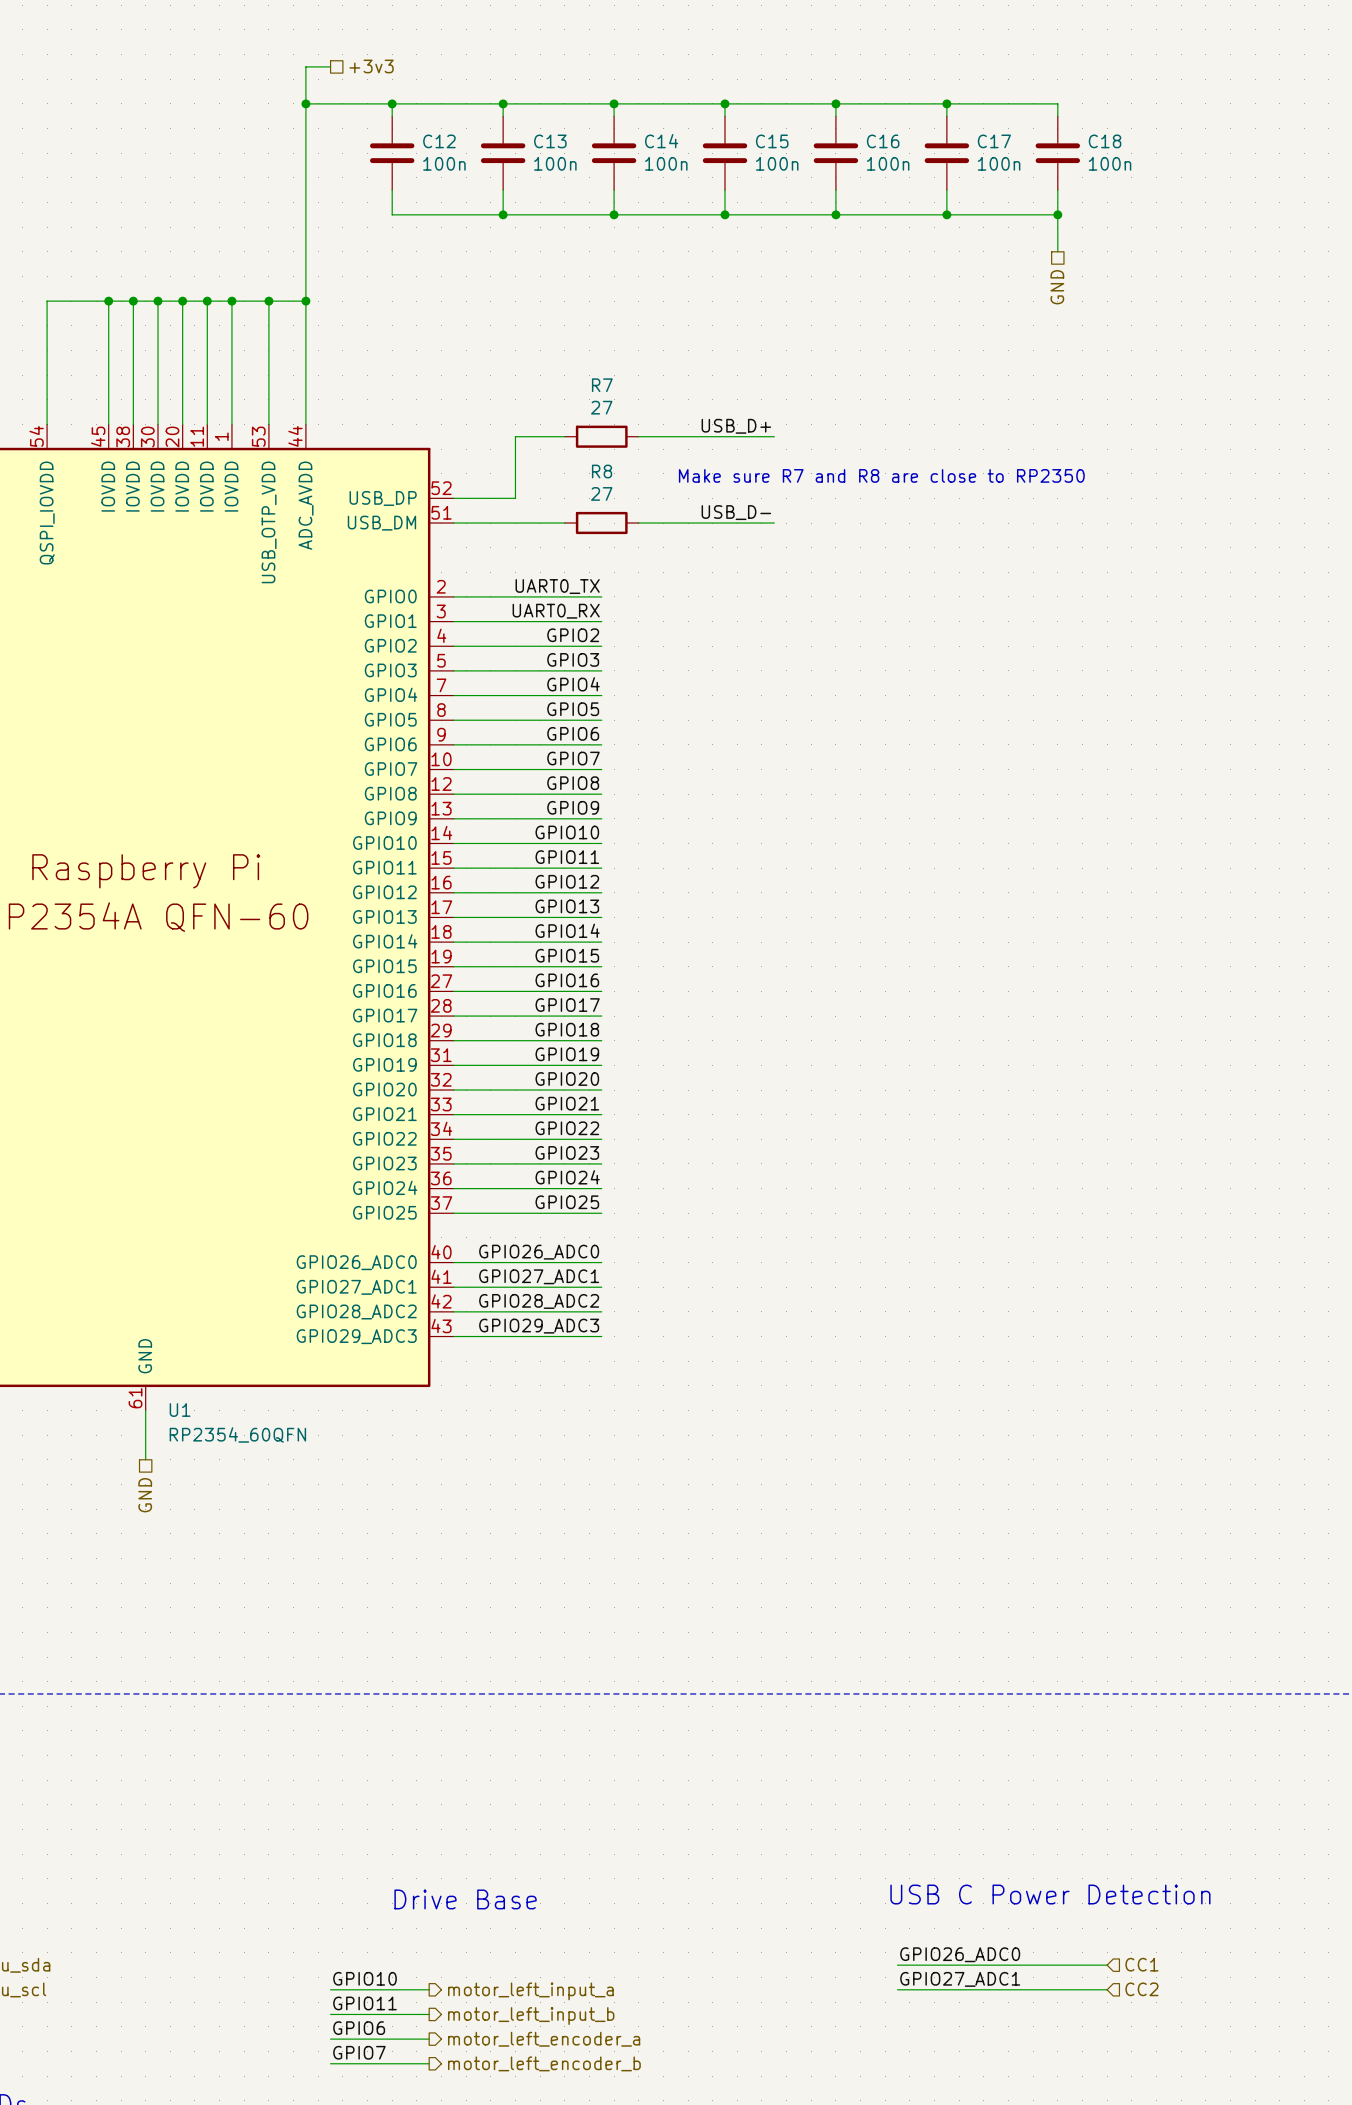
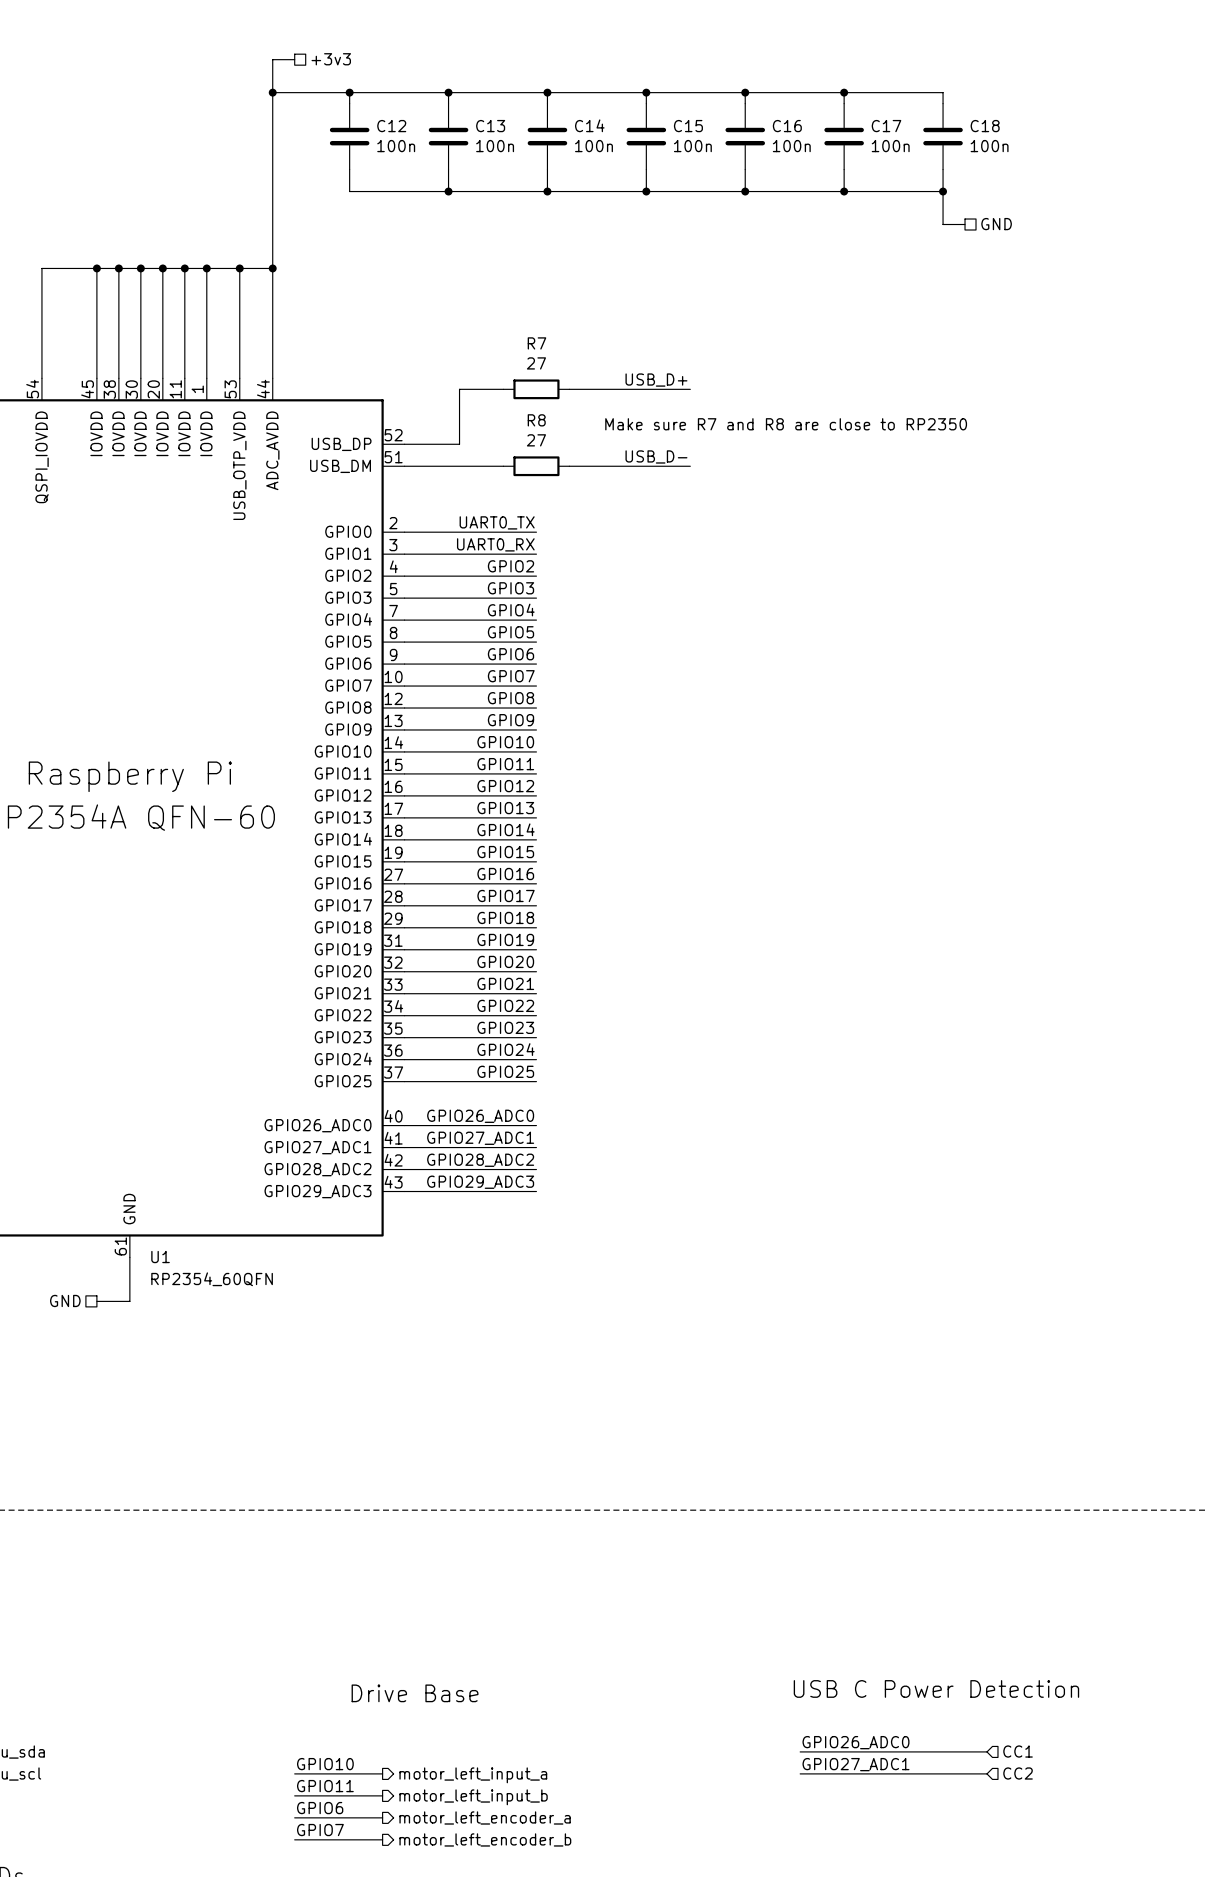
wire: none -> (943, 224) (965, 224)
hierarchical label rotation: 0° (1057, 287) -> 90° counterclockwise (996, 224)
hierarchical label position: GND (1057, 287) -> GND (996, 224)
wire: none -> (96, 1301) (129, 1301)
hierarchical label rotation: 0° (145, 1495) -> 90° clockwise (65, 1300)
hierarchical label position: GND (145, 1495) -> GND (65, 1300)

